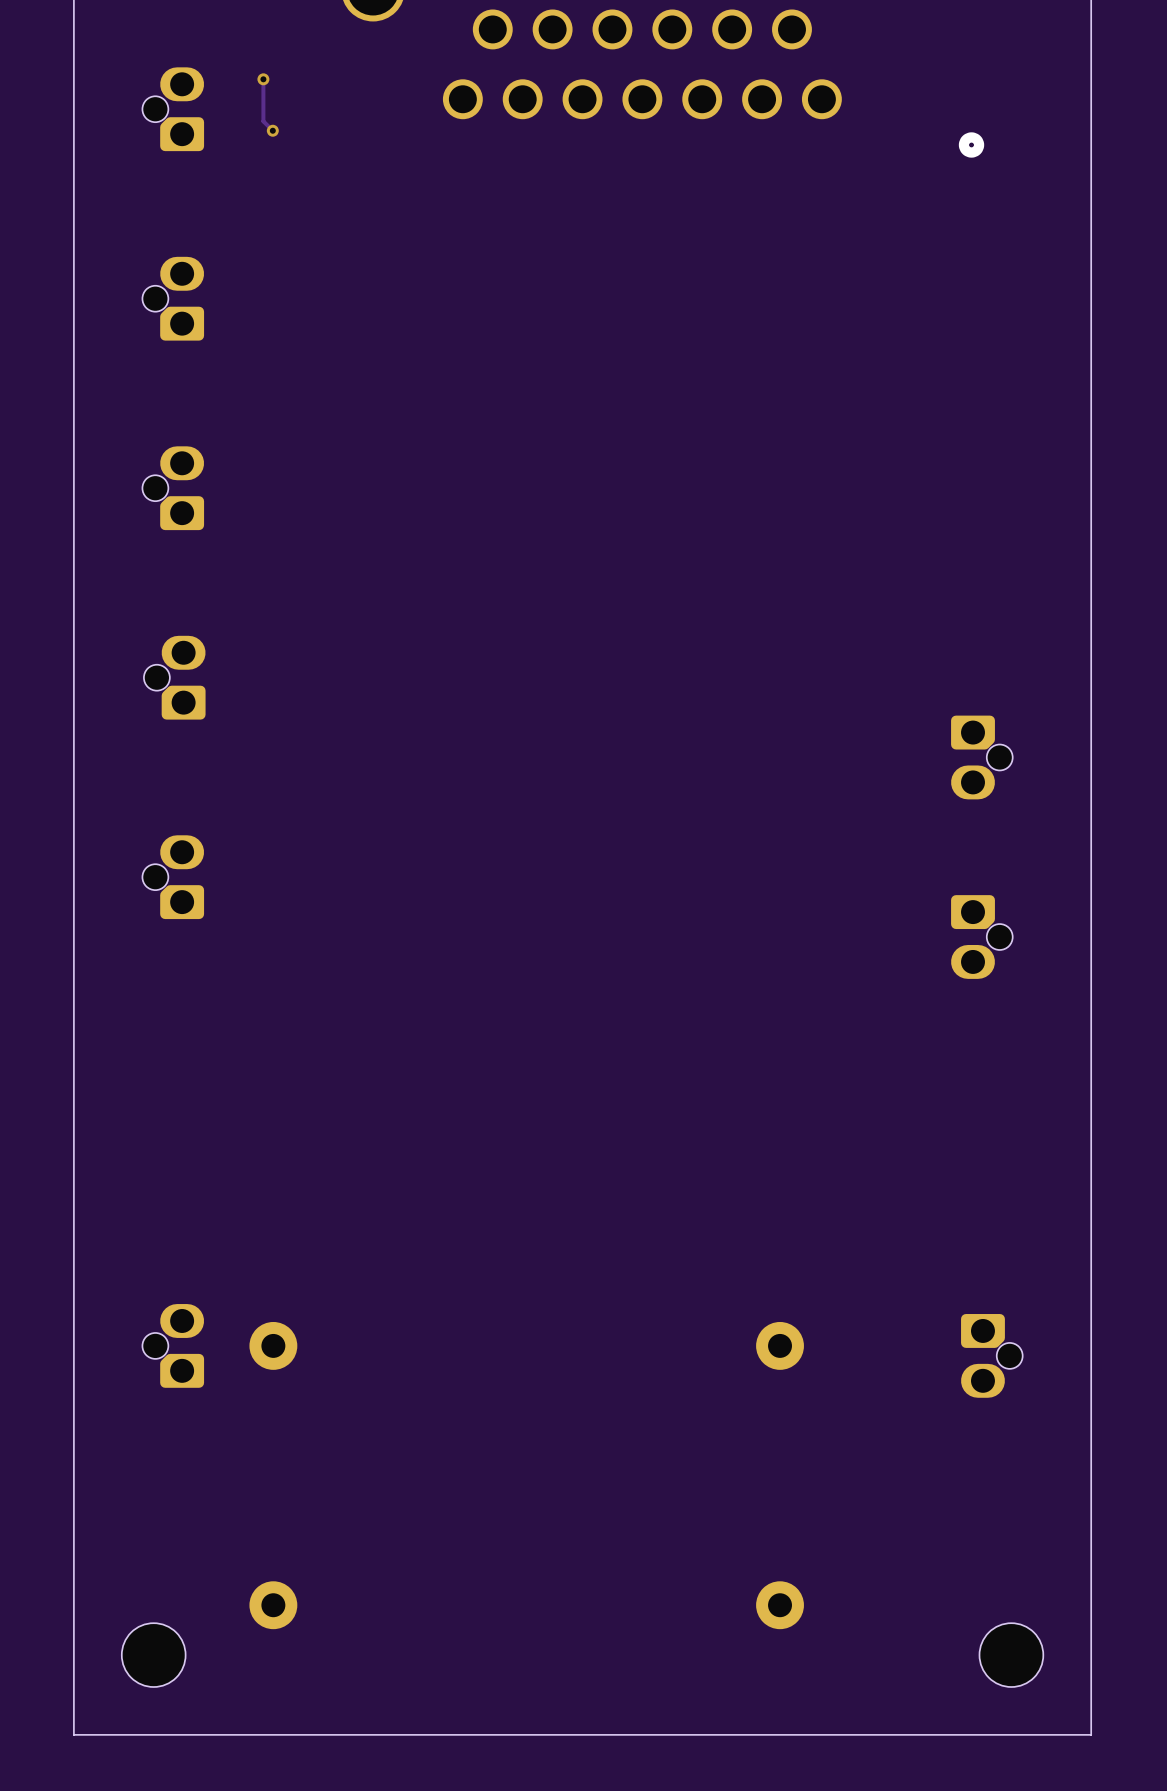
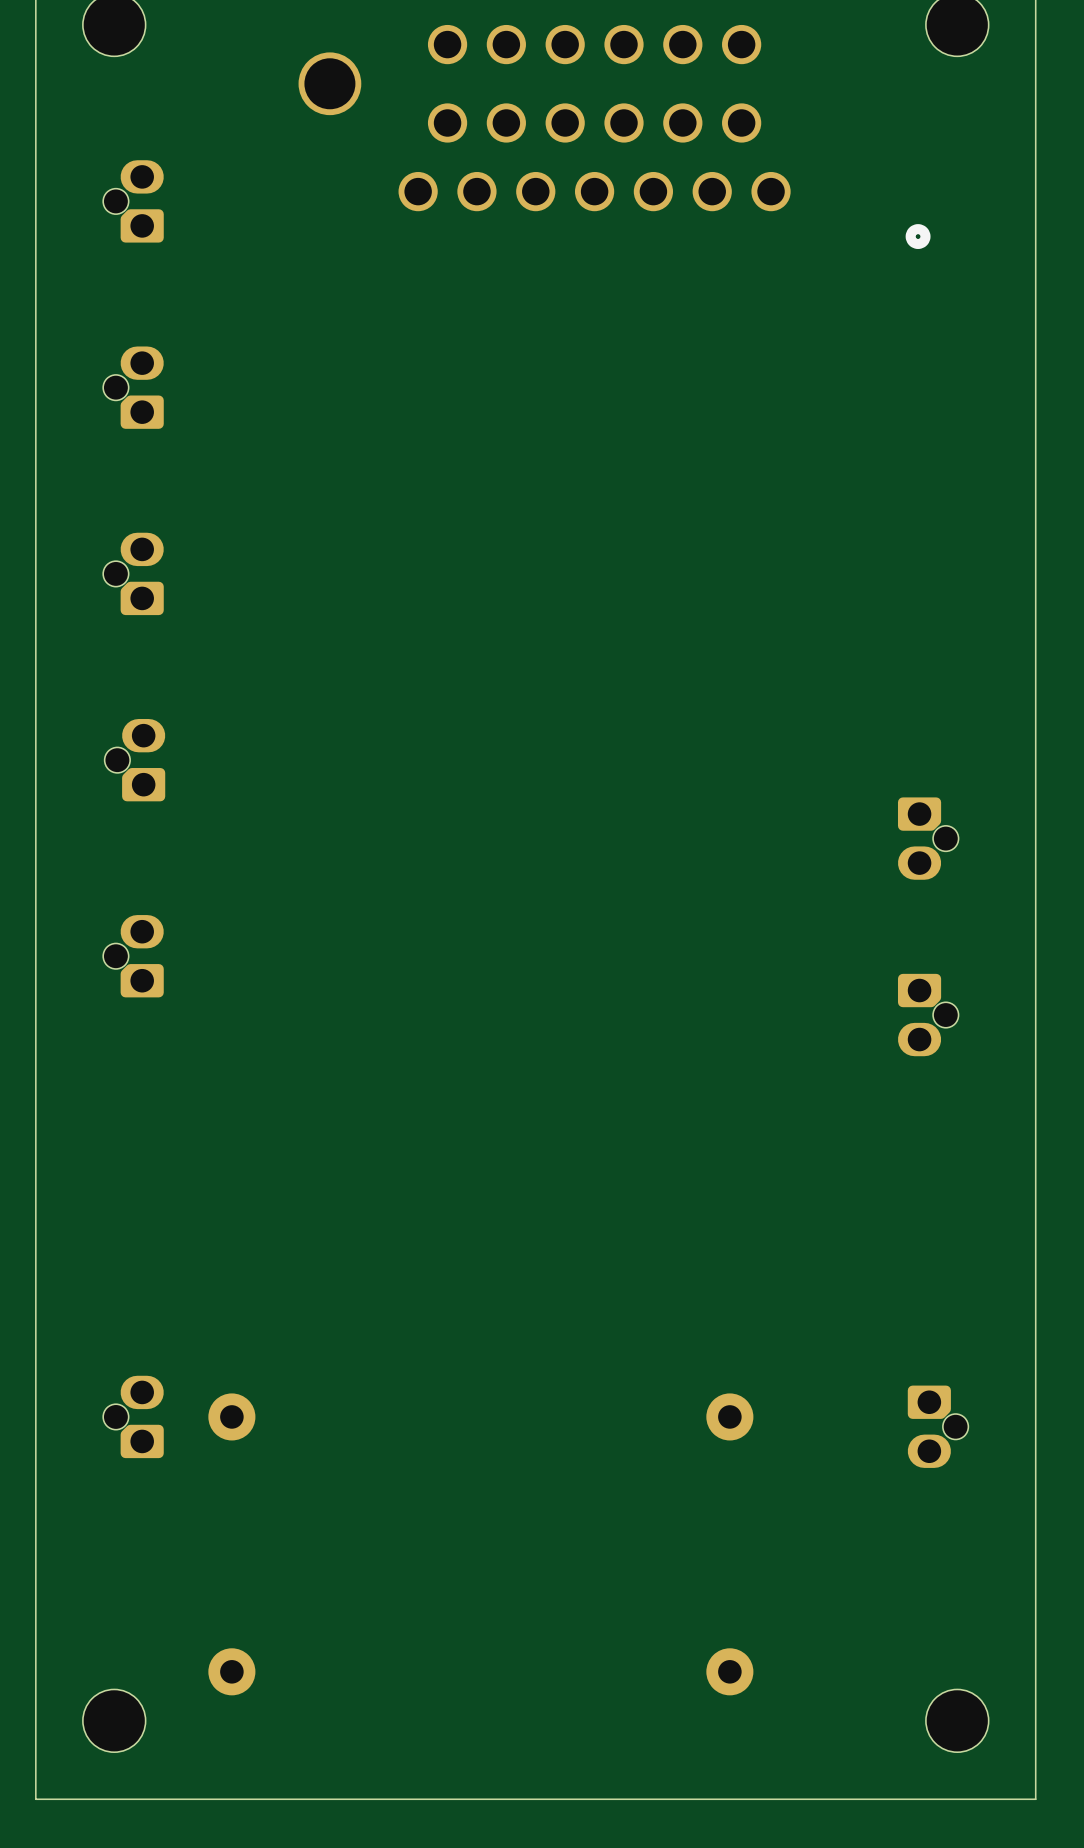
track: (263, 79) (263, 121) (272, 130) -> none
via: (263, 79) -> none
via: (272, 130) -> none

